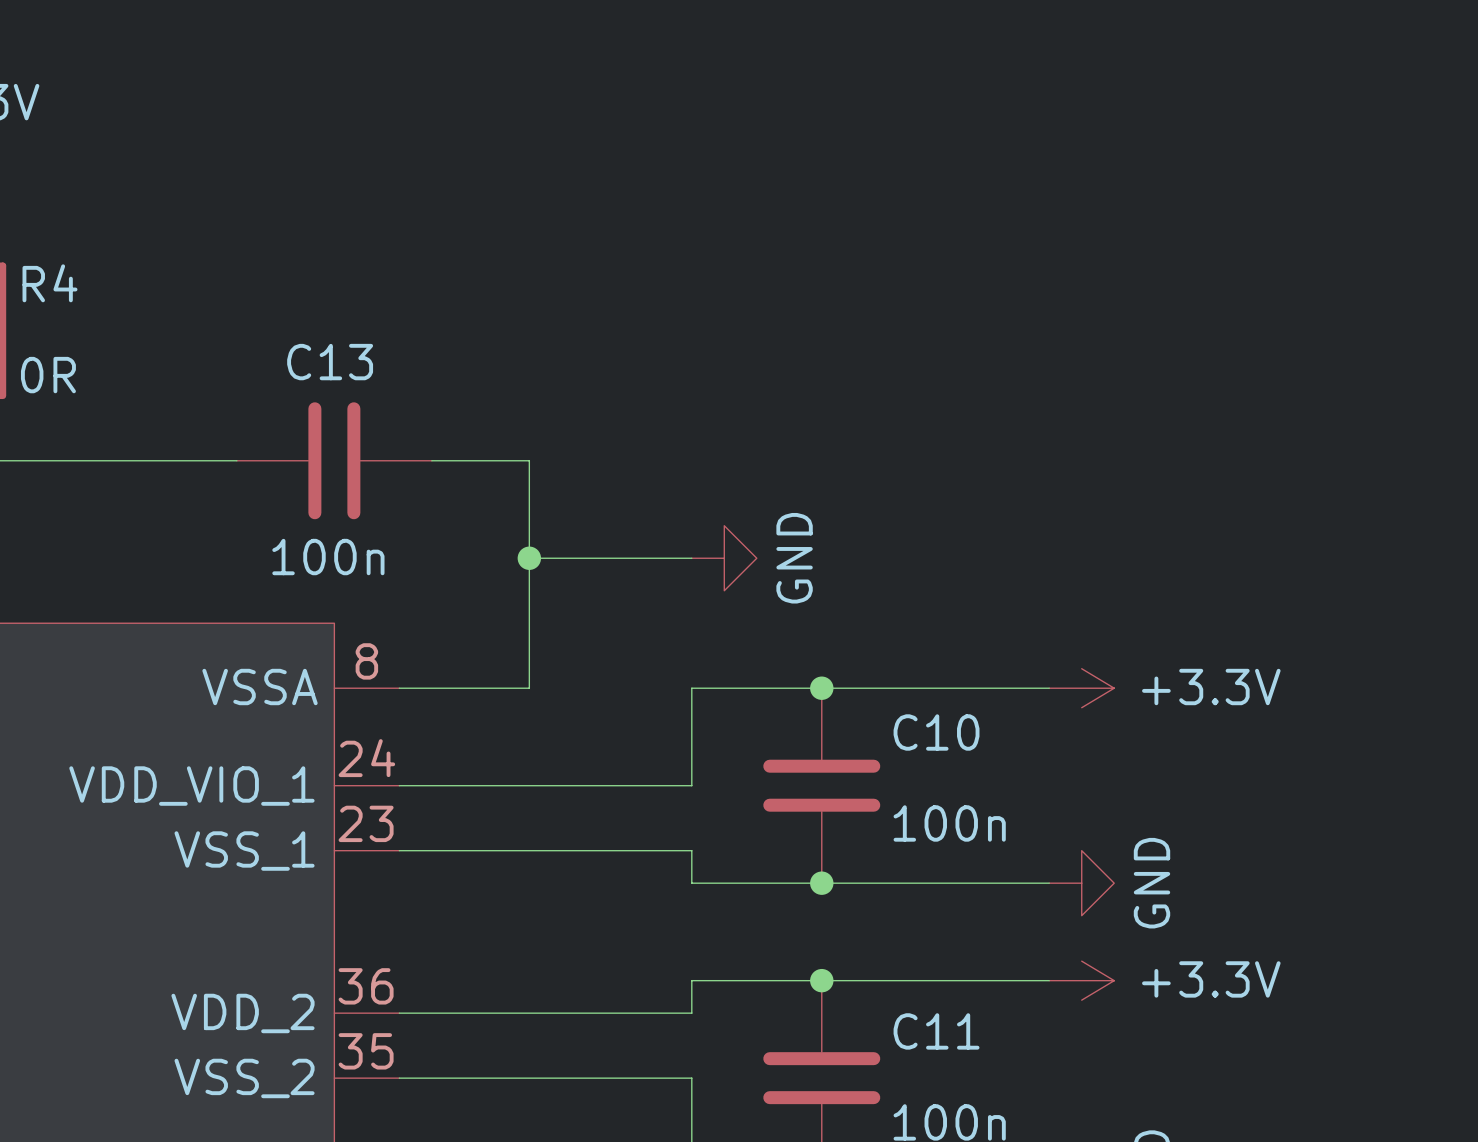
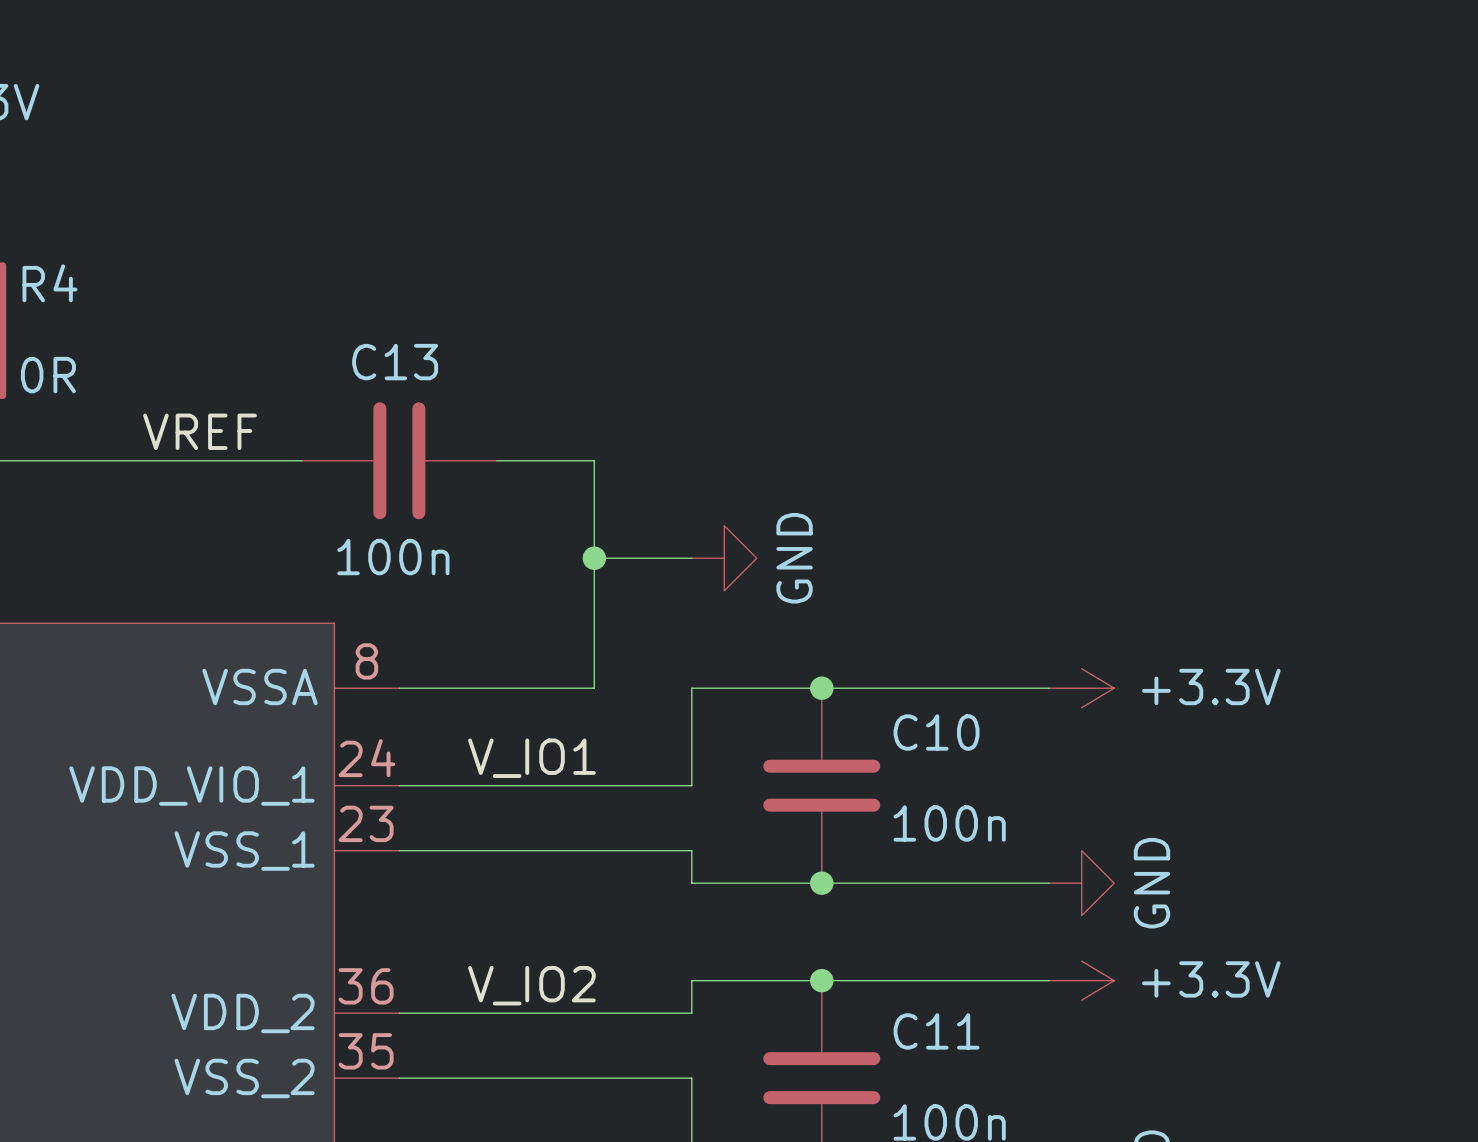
label: none -> VREF (200, 431)
C13 position: (334, 460) -> (399, 460)
wire: (529, 460) (529, 688) -> (529, 460) (594, 460) (594, 688) (529, 688)
wire: (529, 558) (594, 558) -> none
junction position: (529, 558) -> (594, 558)
label: none -> V_IO1 (531, 758)
label: none -> V_IO2 (531, 985)

